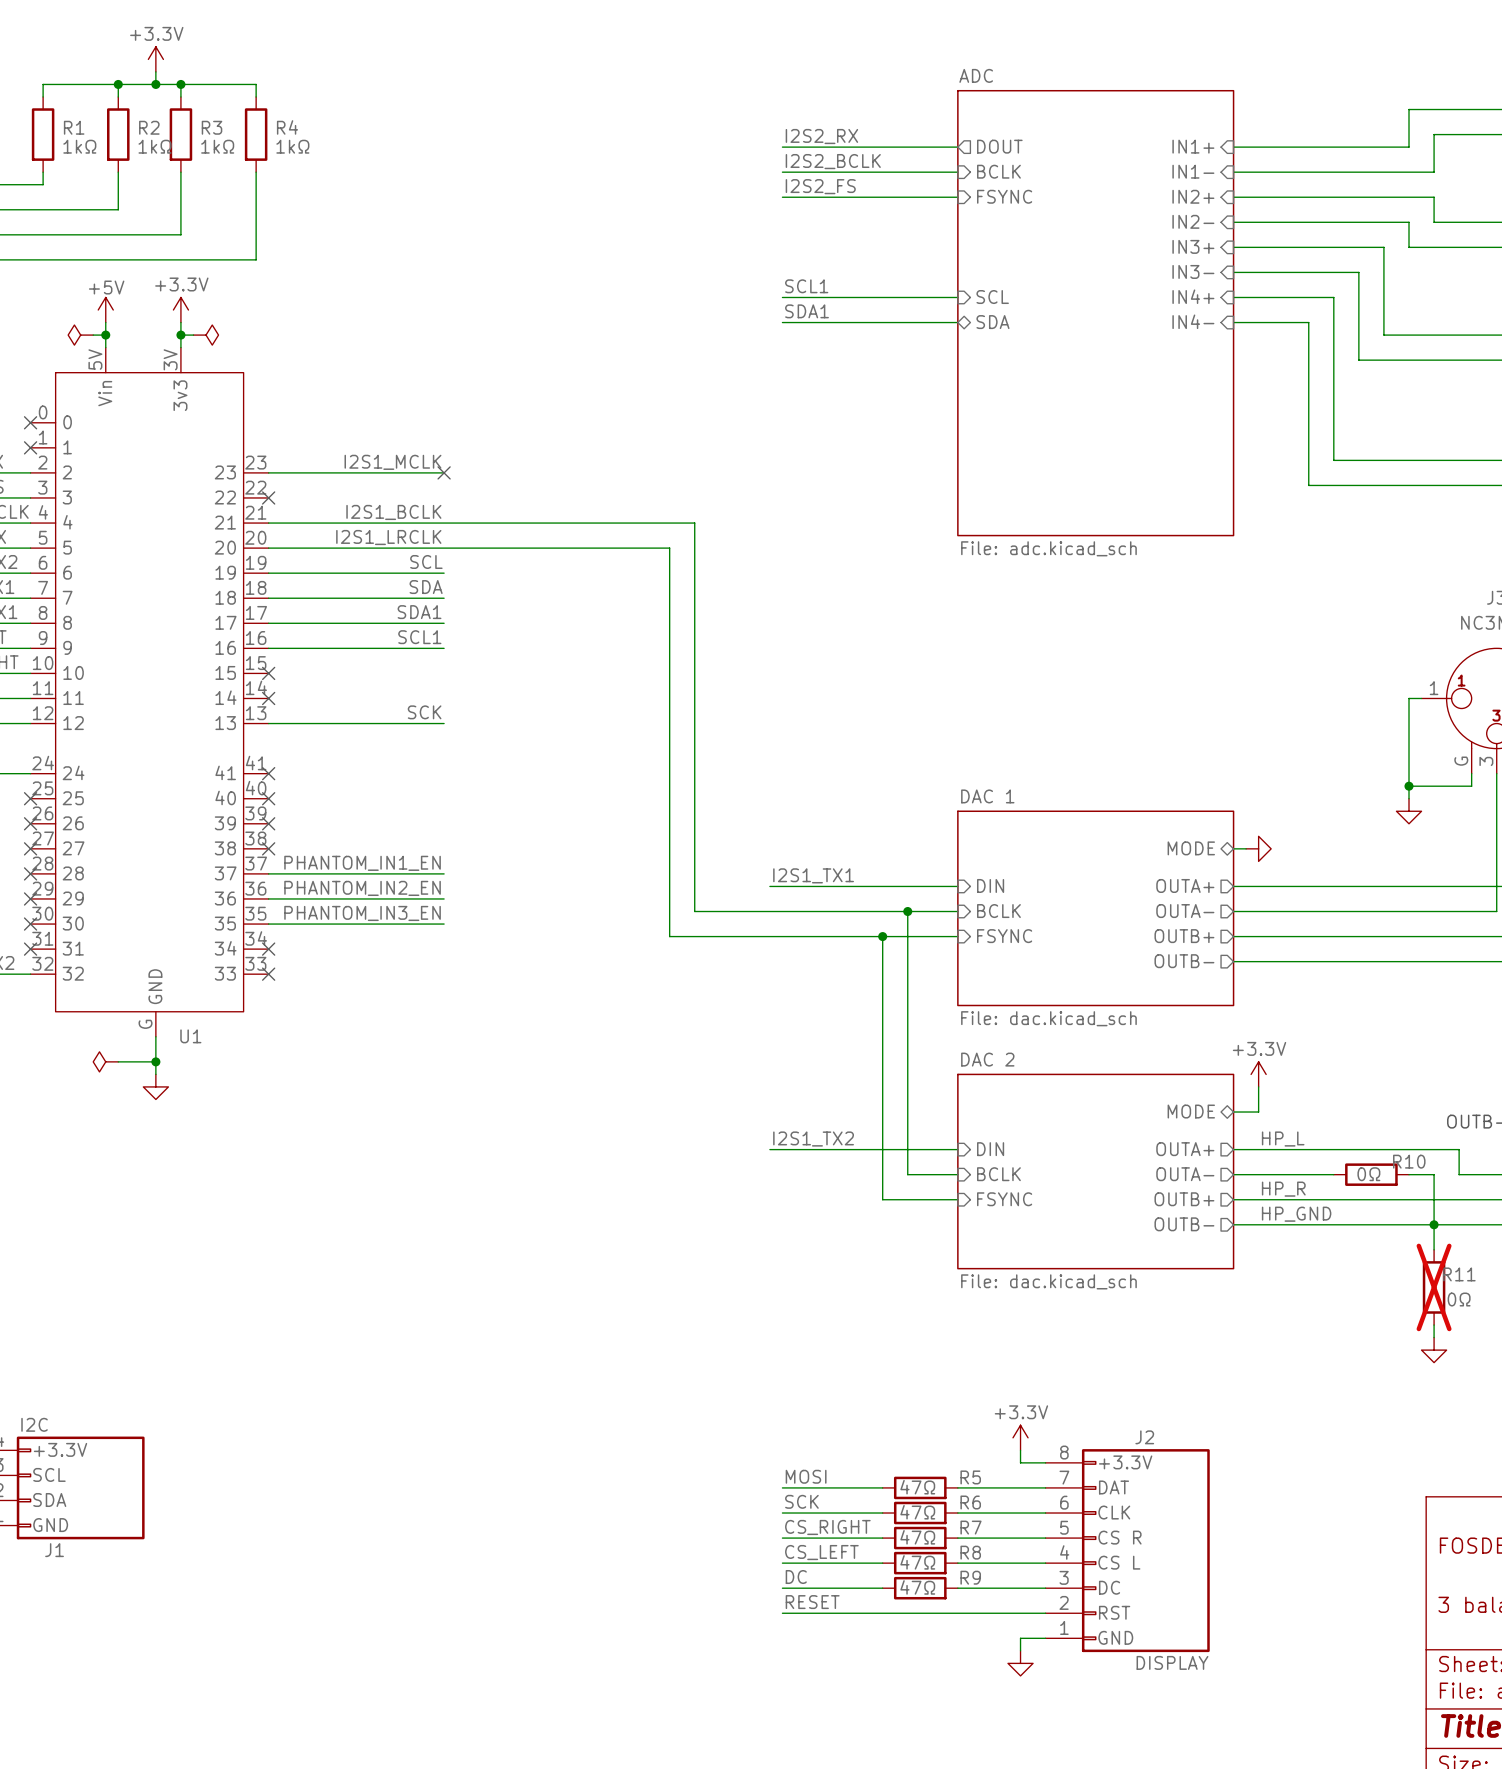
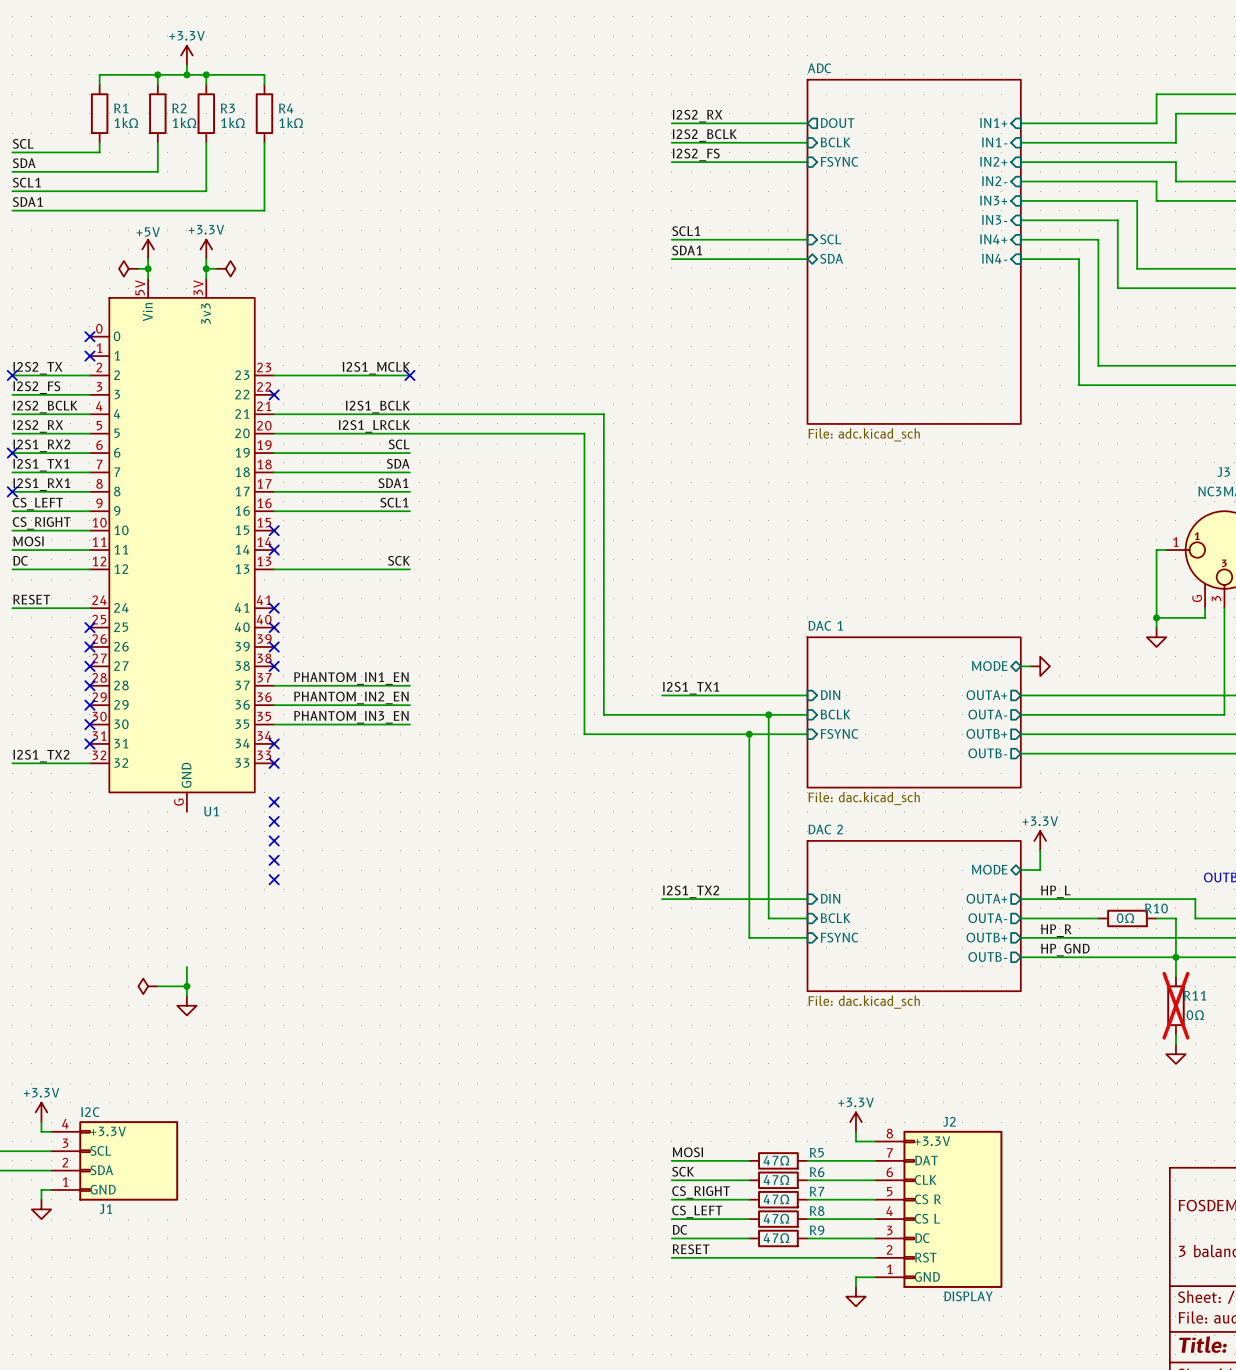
no-connect mark: none -> (274, 802)
wire: (155, 1036) (155, 1074) -> (186, 966) (186, 996)
no-connect mark: none -> (274, 821)
power symbol position: (105, 1061) -> (148, 986)
wire: (118, 1061) (155, 1061) -> (157, 986) (186, 986)
junction: (155, 1061) -> none
no-connect mark: none -> (274, 840)
power symbol position: (155, 1086) -> (186, 1005)
no-connect mark: none -> (274, 860)
no-connect mark: none -> (274, 879)
junction: none -> (186, 986)

